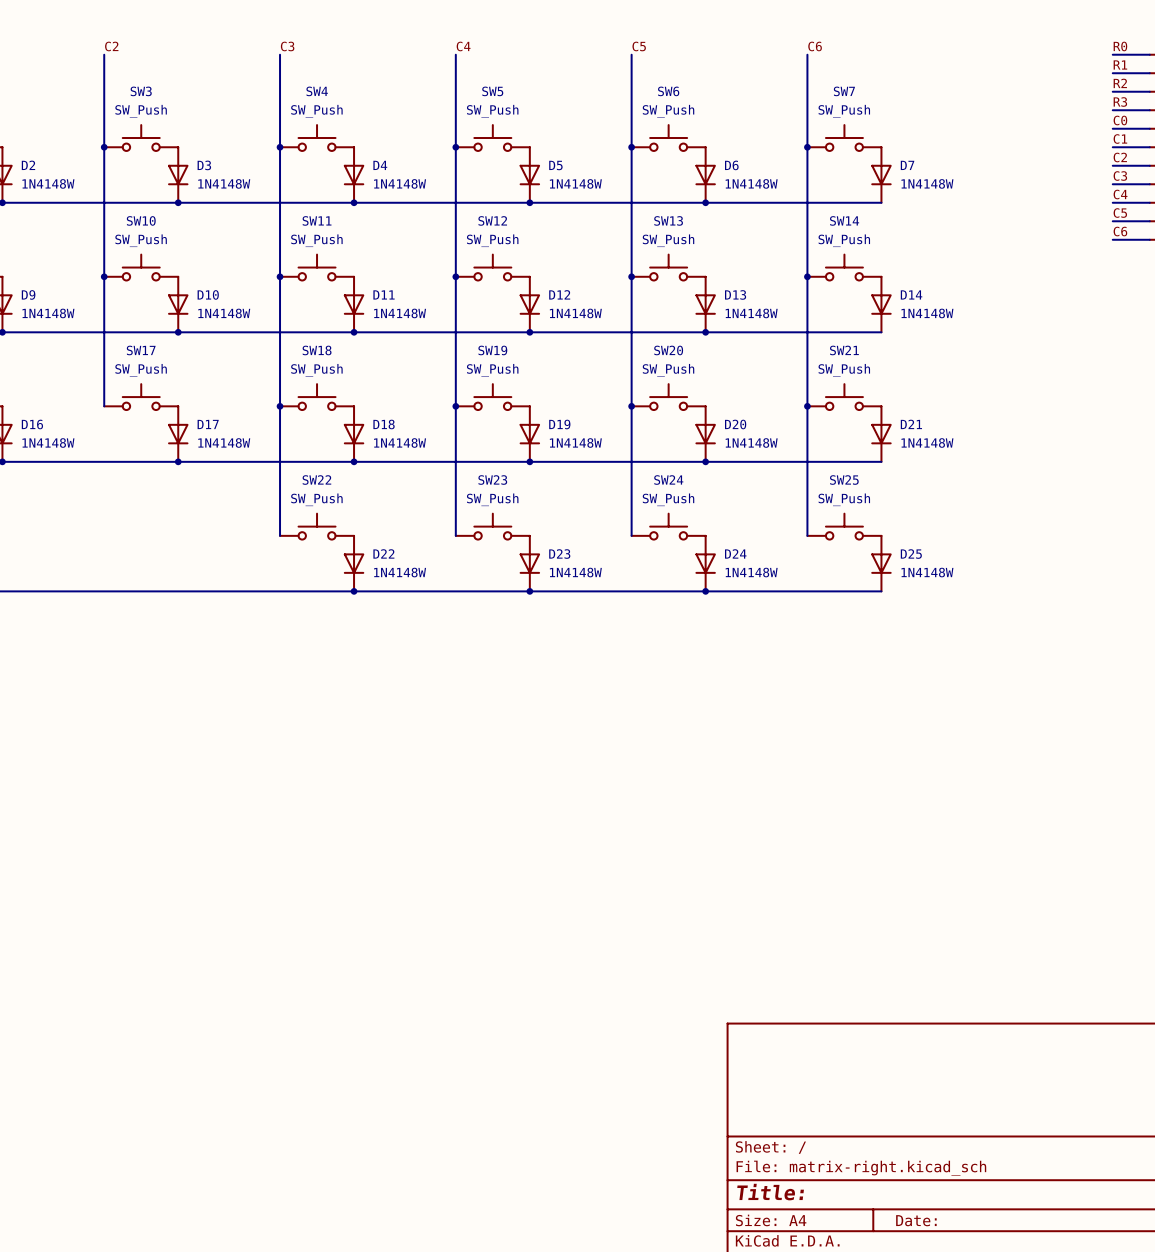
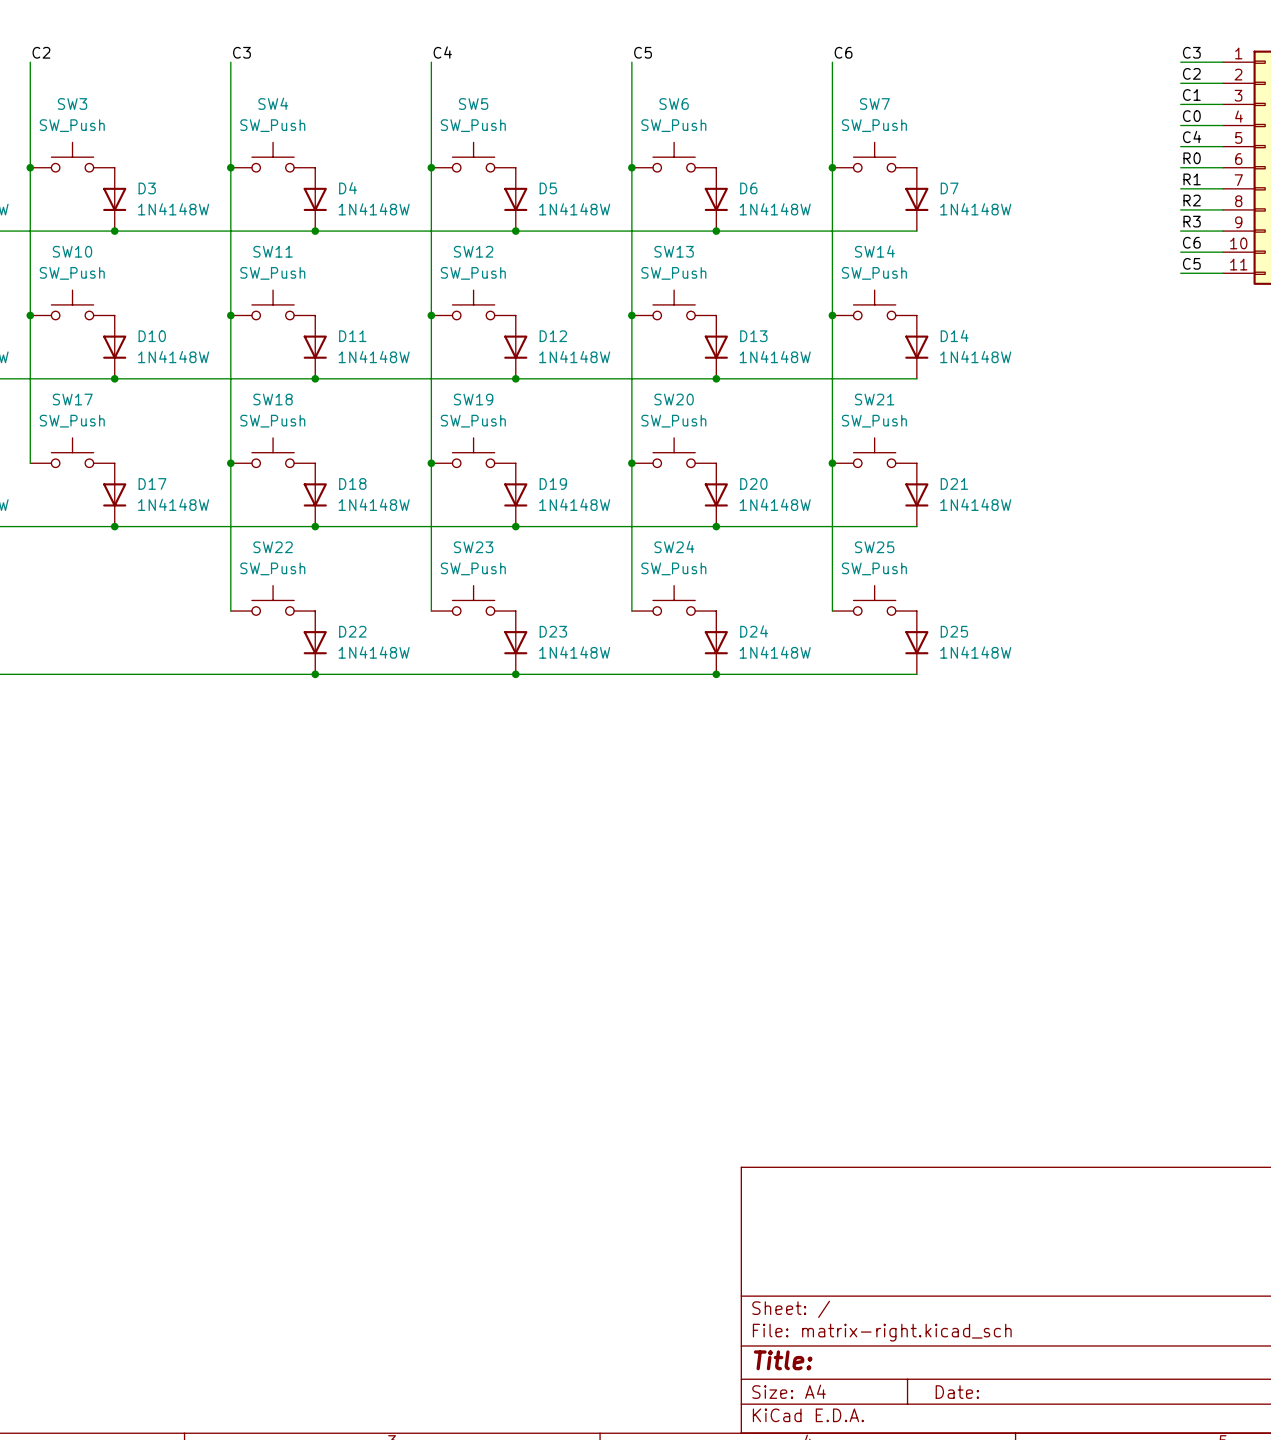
label: R0 (1120, 46) -> C3 (1191, 52)
label: R1 (1120, 64) -> C2 (1191, 73)
label: R2 (1120, 83) -> C1 (1191, 94)
label: R3 (1120, 101) -> C0 (1191, 116)
label: C0 (1120, 120) -> C4 (1192, 136)
label: C1 (1120, 139) -> R0 (1192, 158)
label: C2 (1120, 157) -> R1 (1192, 179)
label: C3 (1120, 176) -> R2 (1192, 200)
label: C4 (1120, 194) -> R3 (1192, 221)
label: C5 (1120, 213) -> C6 (1191, 242)
label: C6 (1120, 231) -> C5 (1191, 263)

